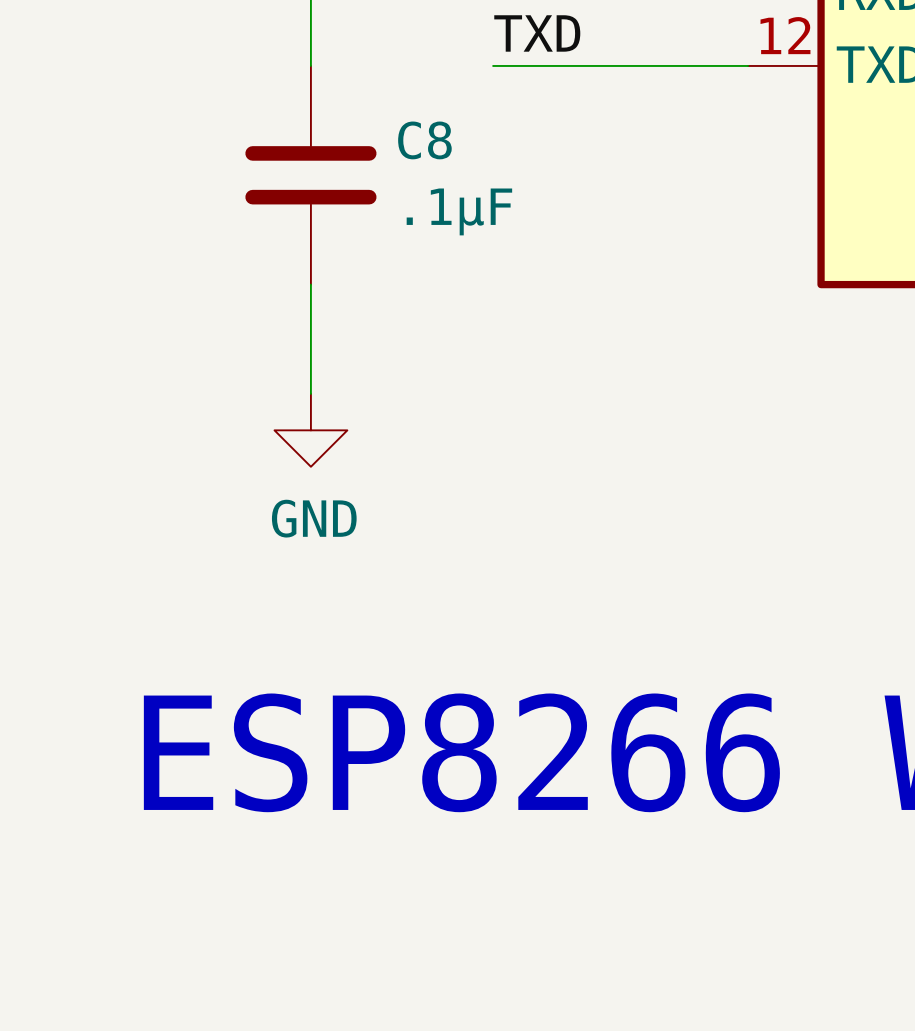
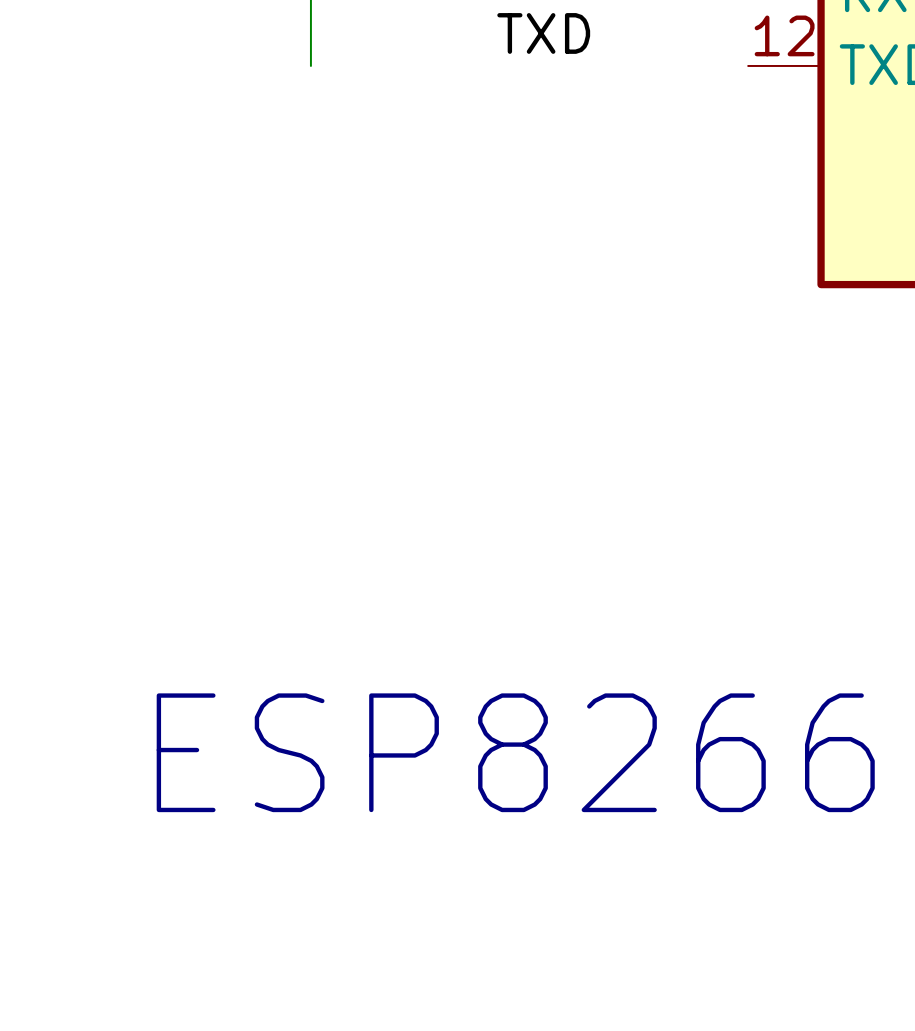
wire: (493, 65) (748, 65) -> none
C8: .1µF (310, 175) -> none
wire: (310, 284) (310, 393) -> none
power symbol: GND (310, 430) -> none

